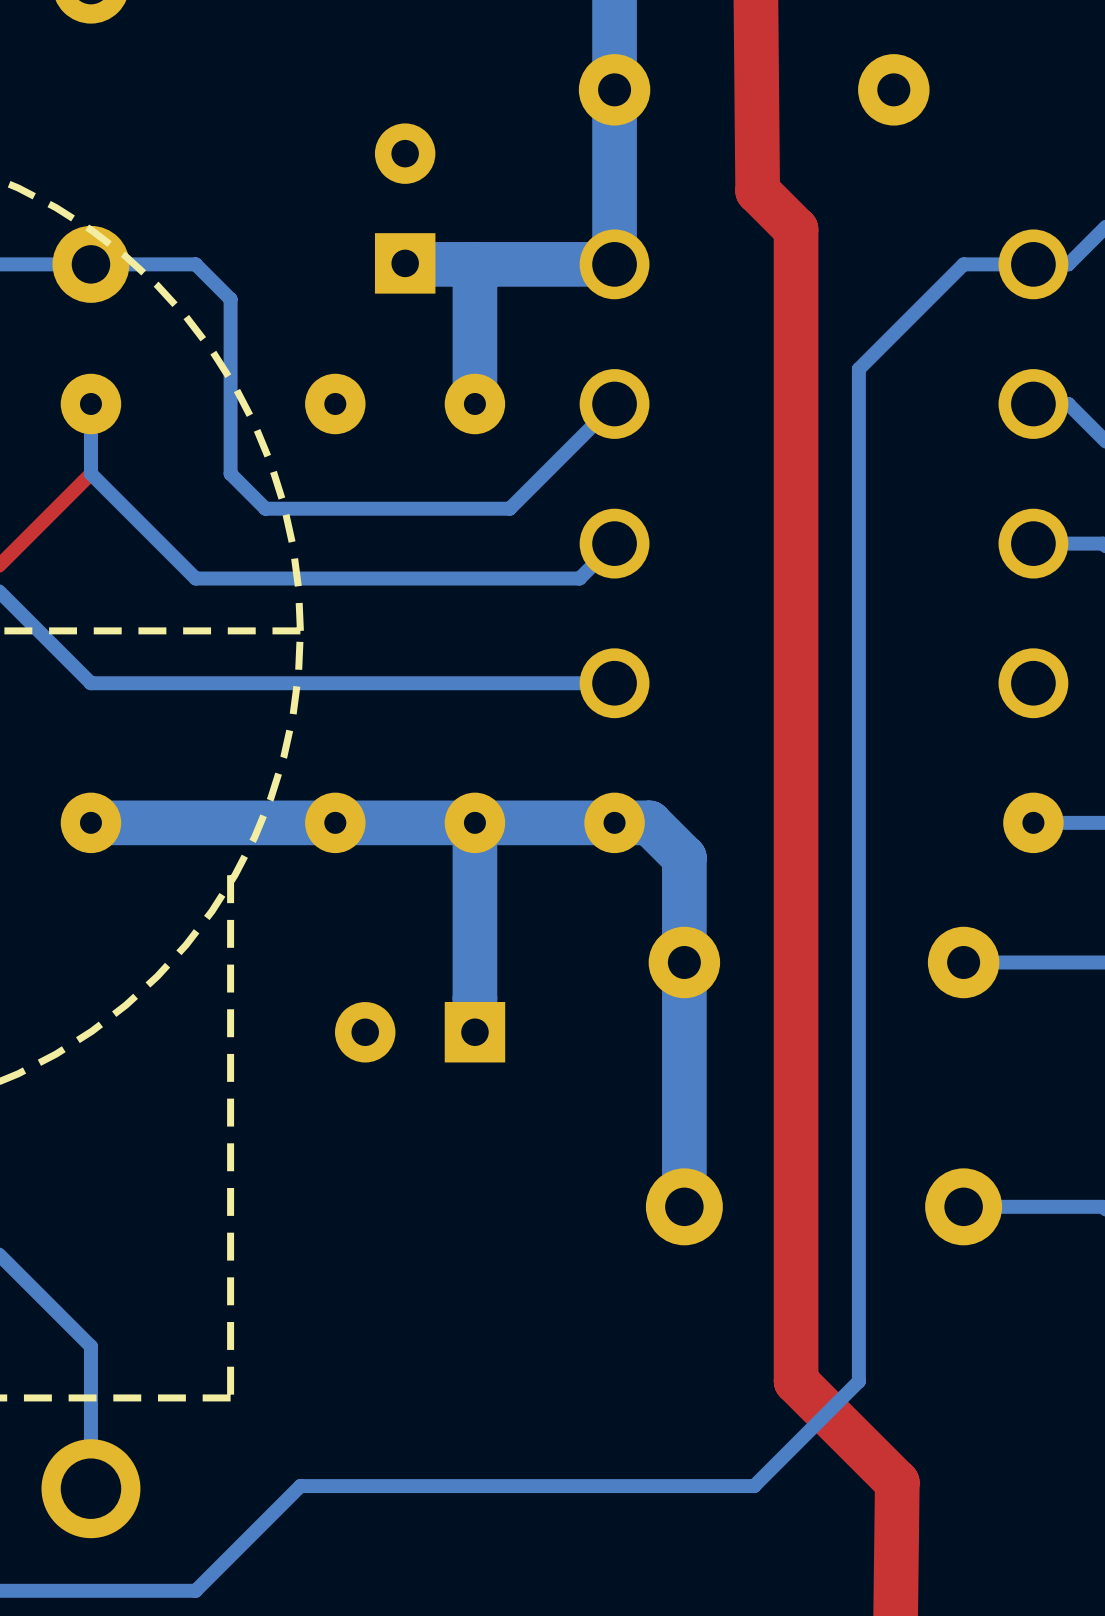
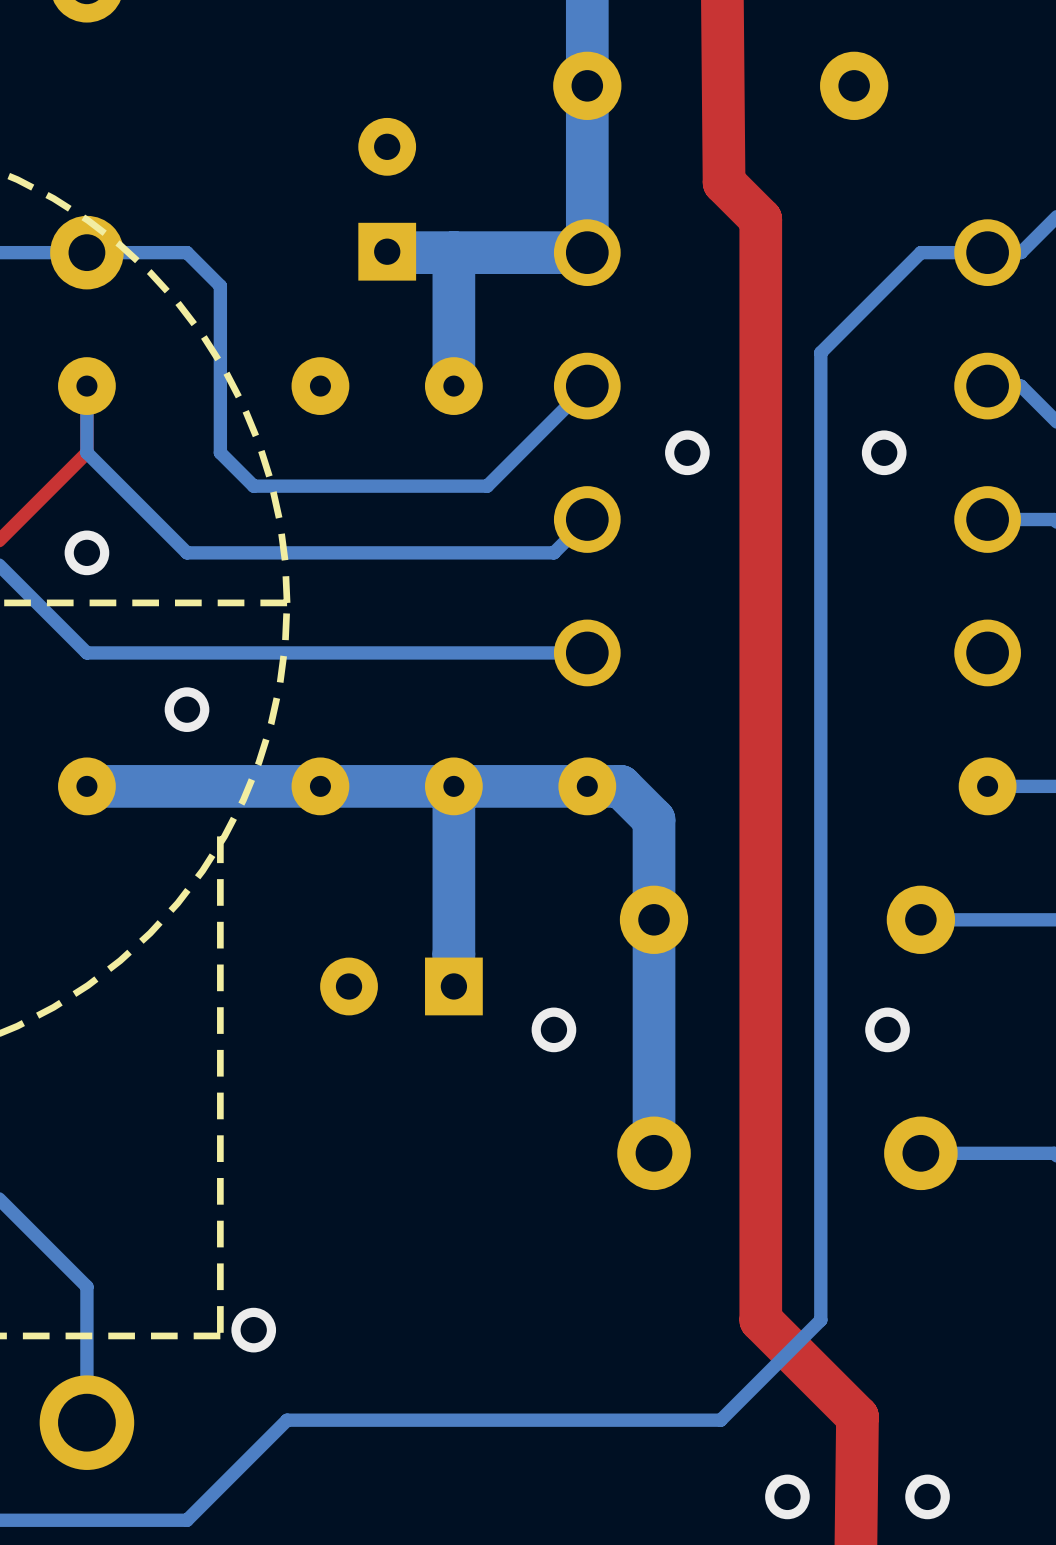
via: none -> (687, 452)
via: none -> (884, 452)
via: none -> (86, 552)
via: none -> (187, 709)
via: none -> (553, 1029)
via: none -> (887, 1029)
via: none -> (253, 1330)
via: none -> (787, 1496)
via: none -> (927, 1496)

